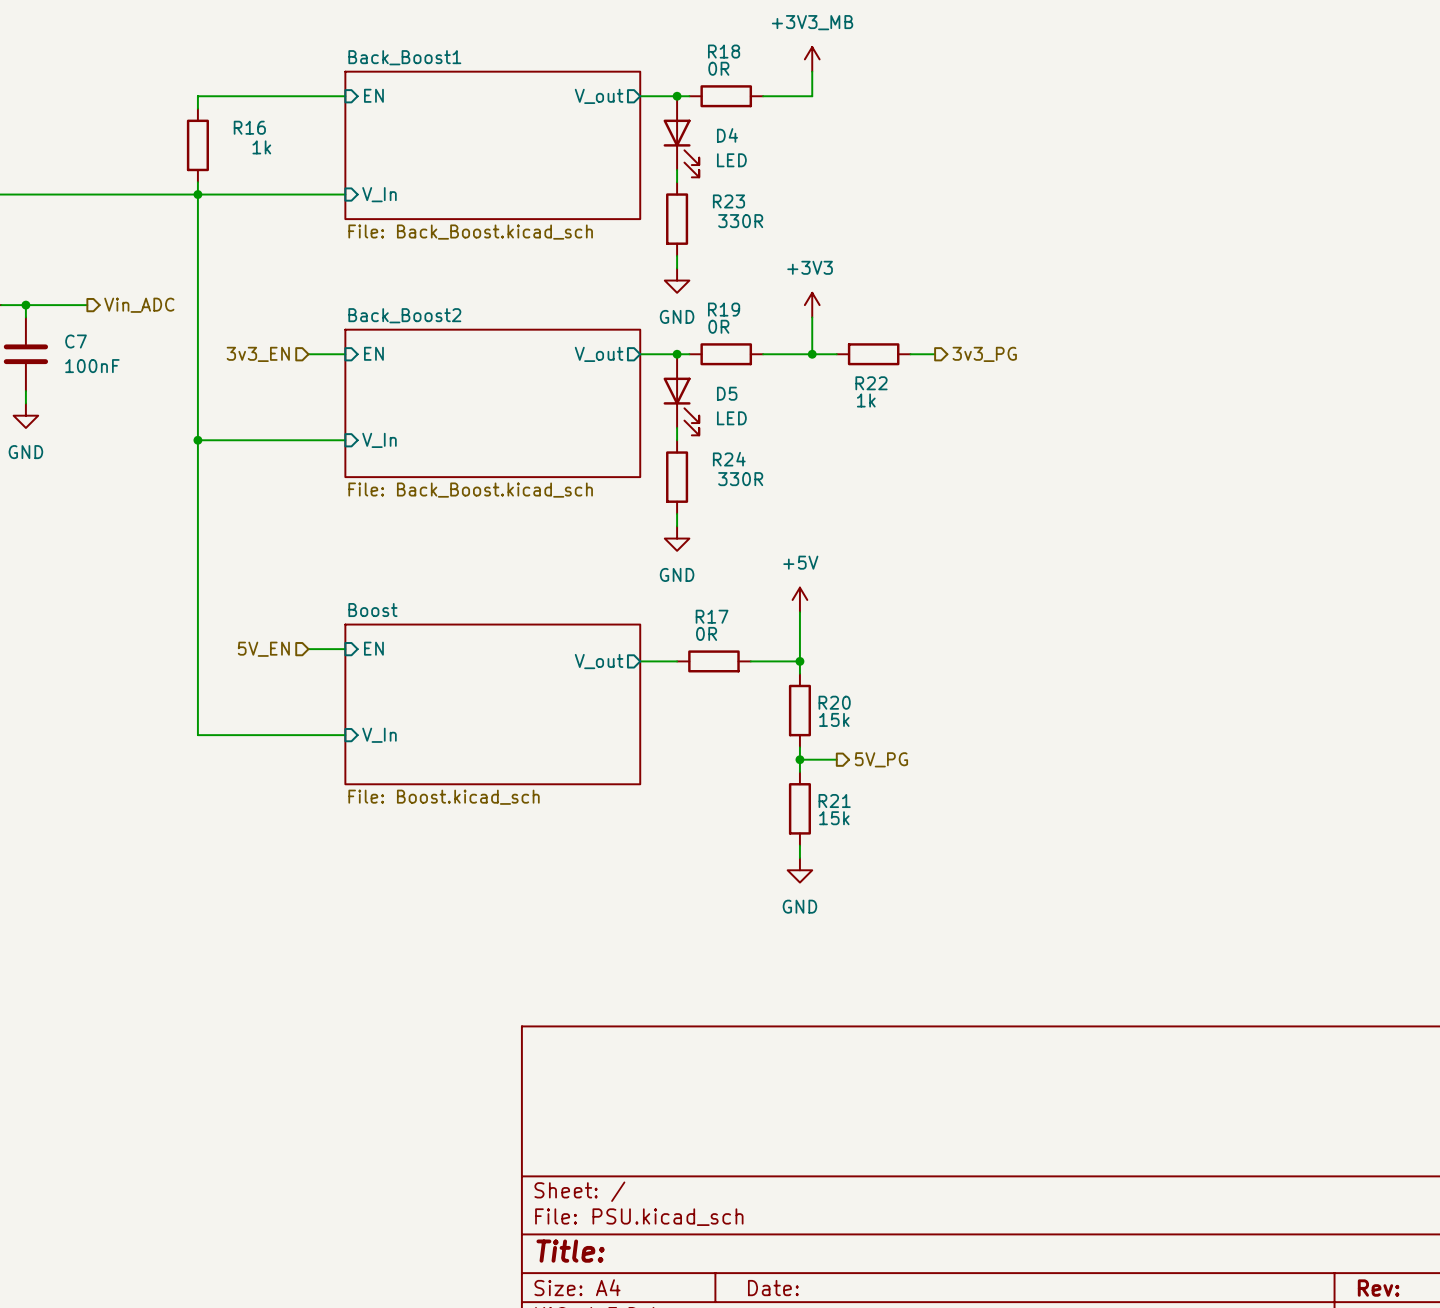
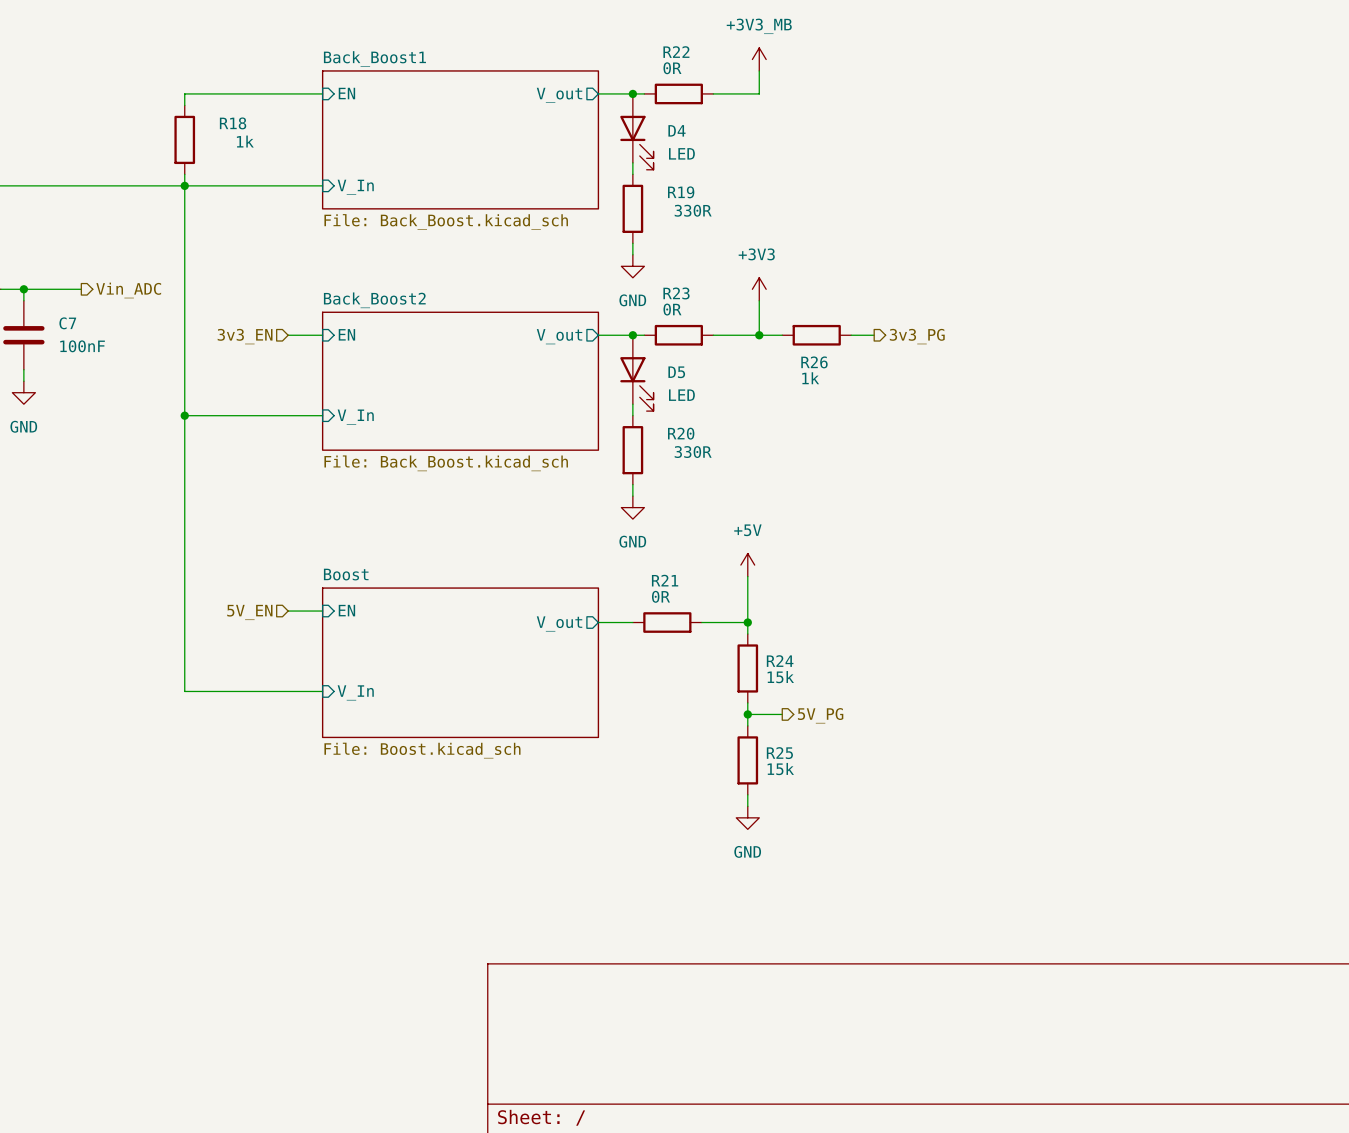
R18 name: R18 (724, 51) -> R22 (676, 52)
R16 name: R16 (249, 127) -> R18 (233, 123)
R23 name: R23 (728, 201) -> R19 (681, 192)
R19 name: R19 (724, 309) -> R23 (676, 293)
R22 name: R22 (871, 383) -> R26 (814, 362)
R24 name: R24 (729, 459) -> R20 (681, 433)
R17 name: R17 (712, 616) -> R21 (665, 580)
R20 name: R20 (834, 702) -> R24 (780, 661)
R21 name: R21 (834, 801) -> R25 (779, 753)

